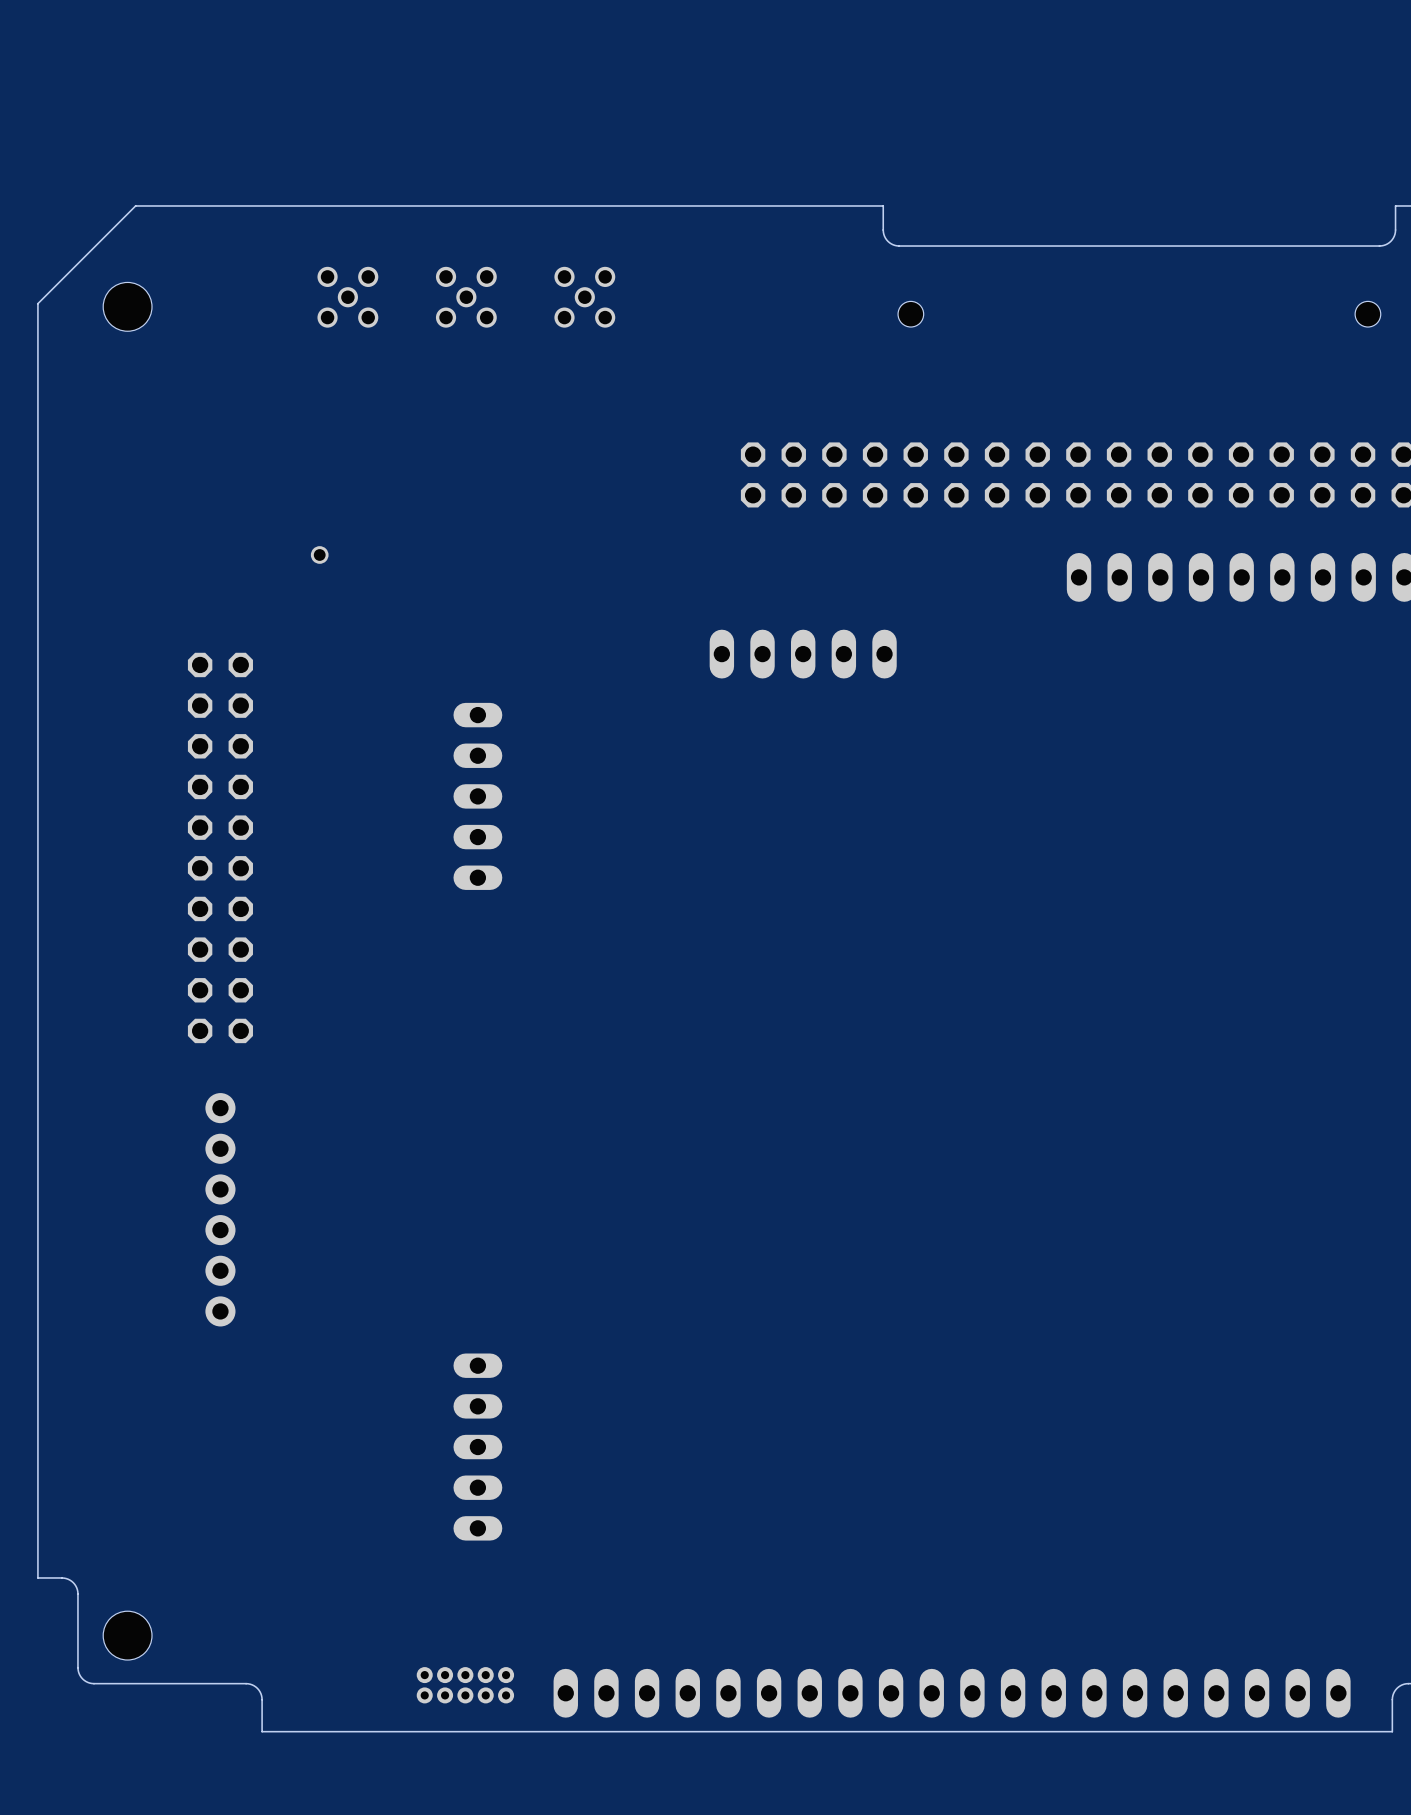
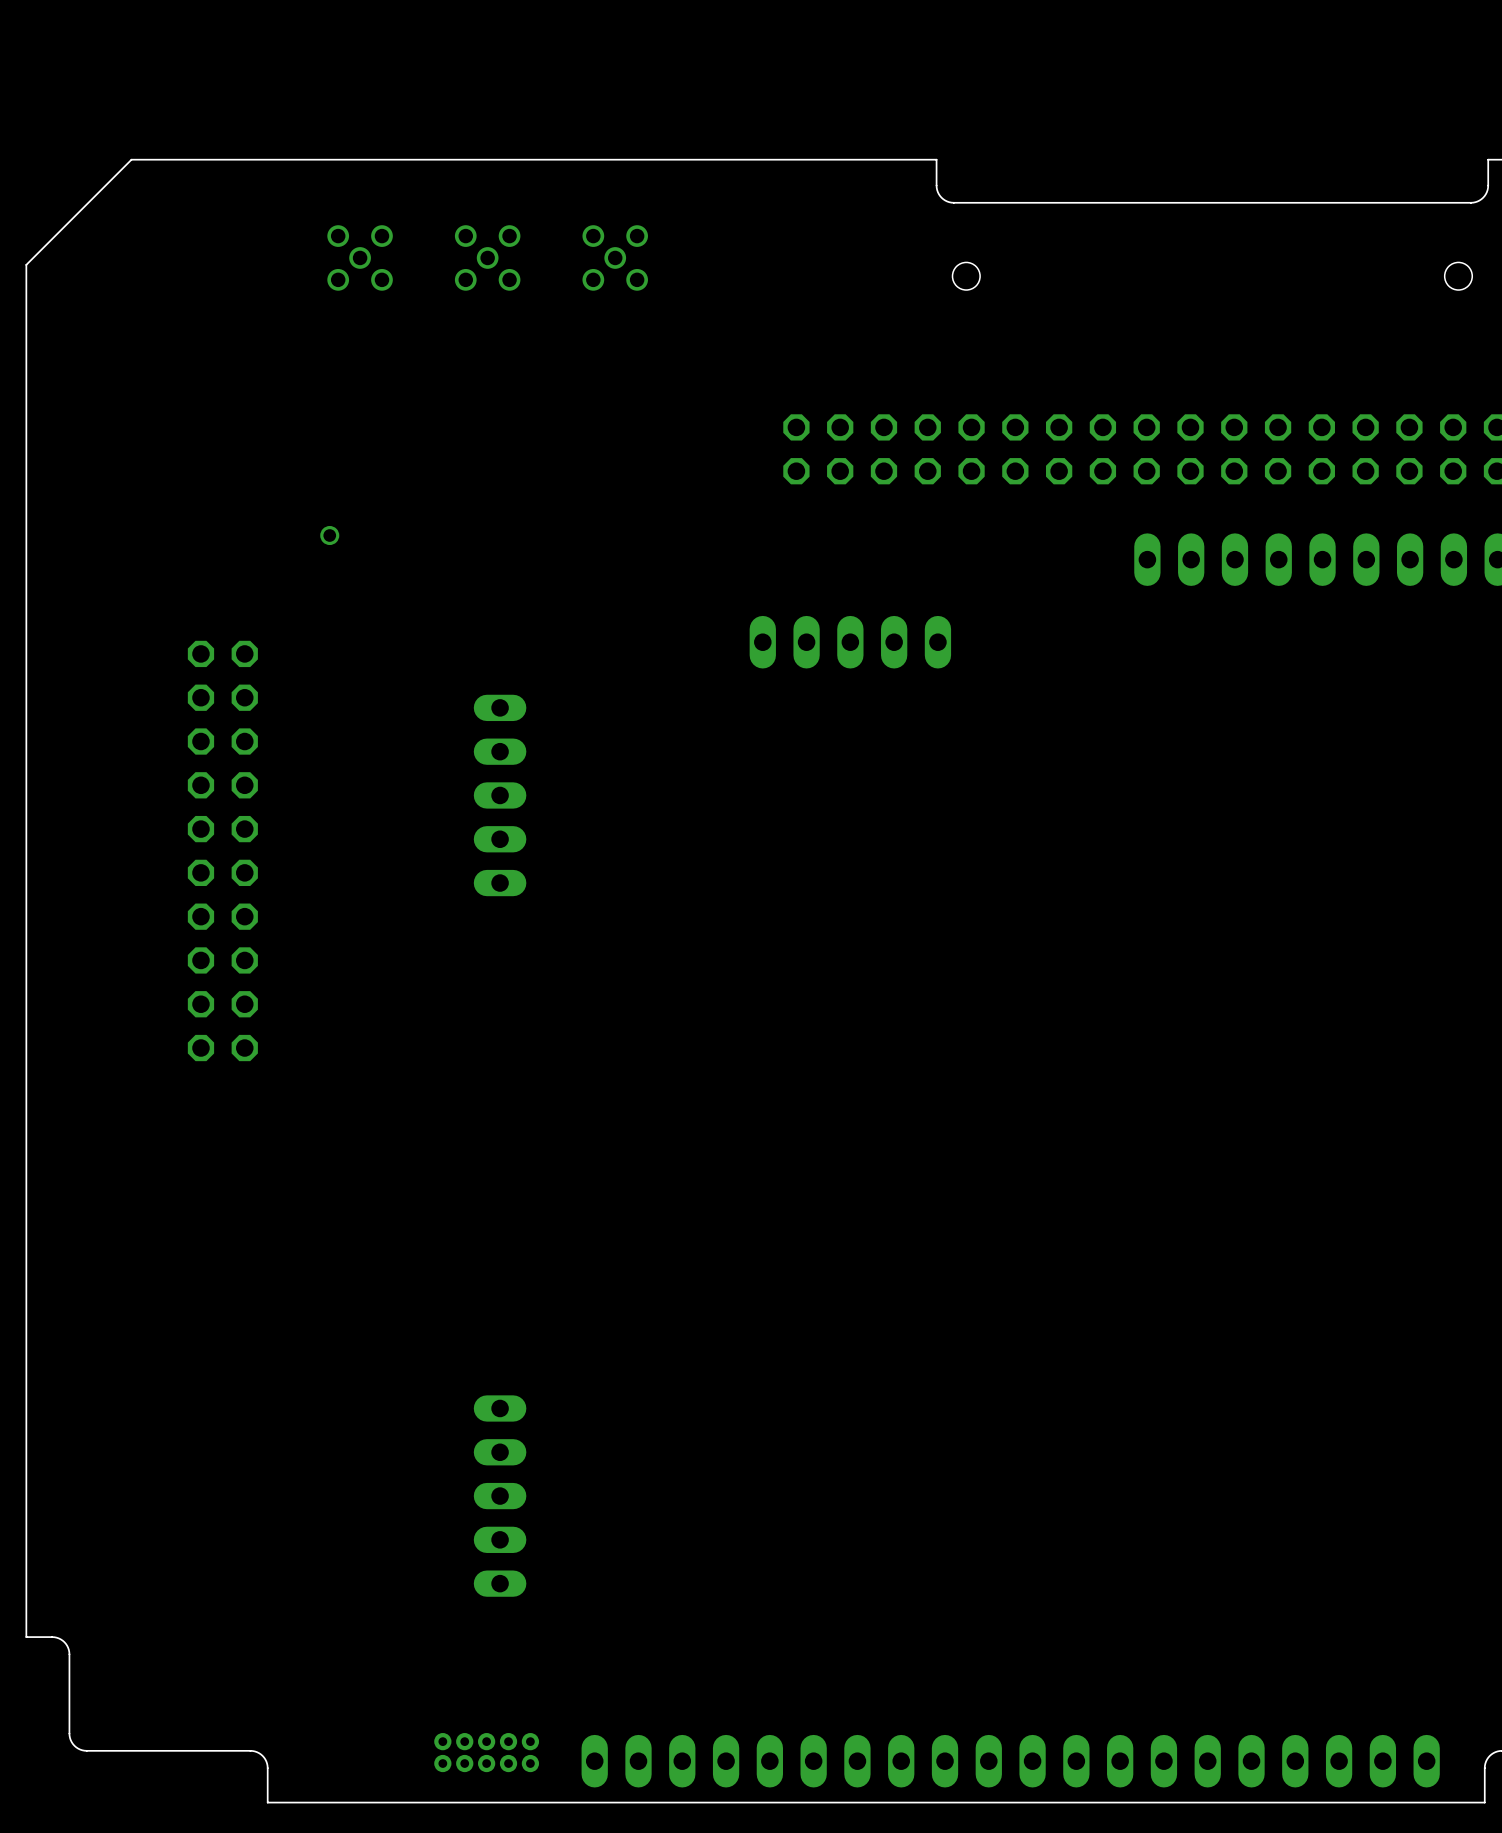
part: (127, 306) -> none
part: (220, 1209) -> none
part: (127, 1635) -> none

